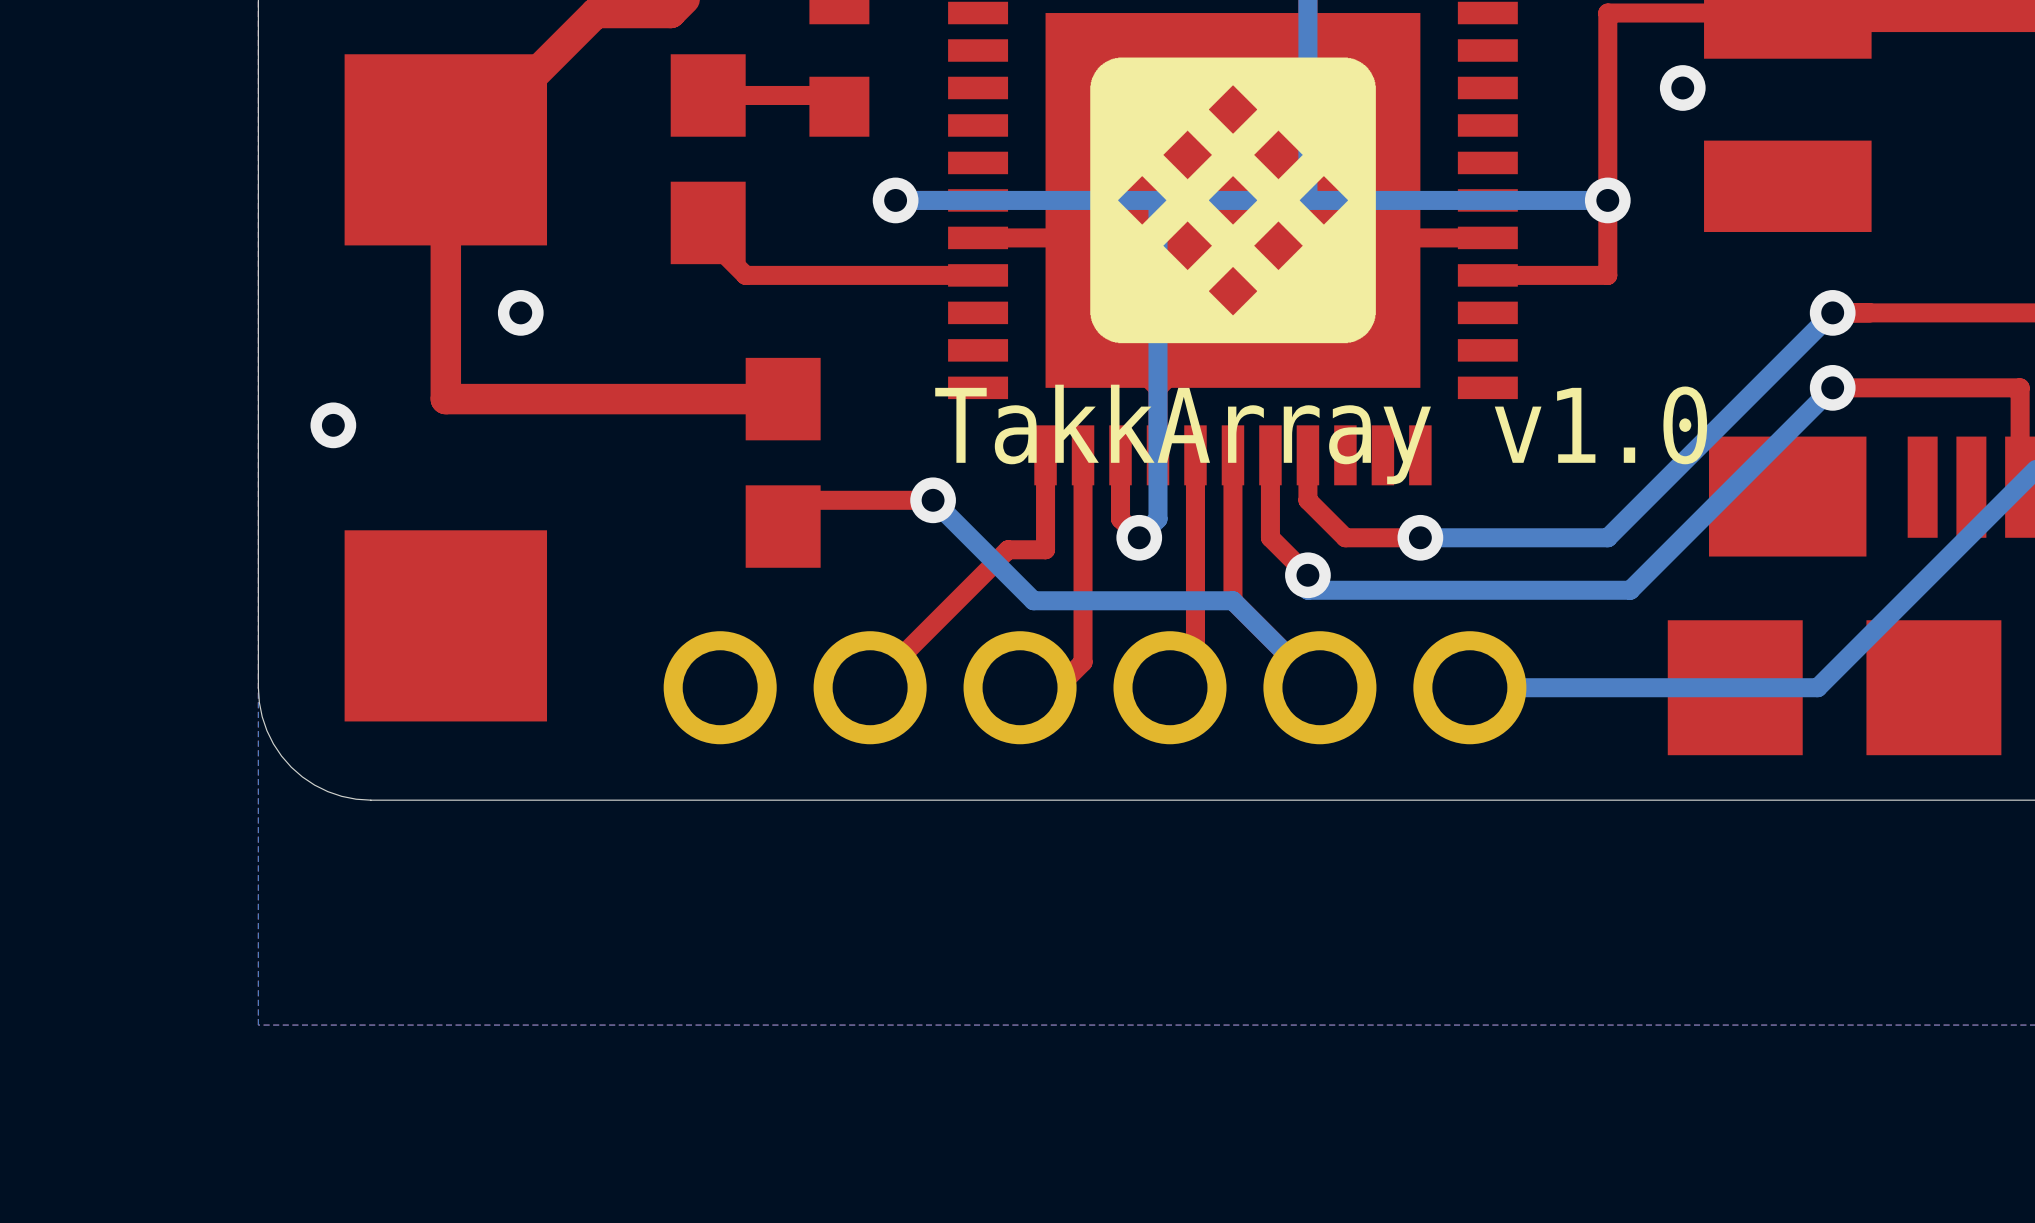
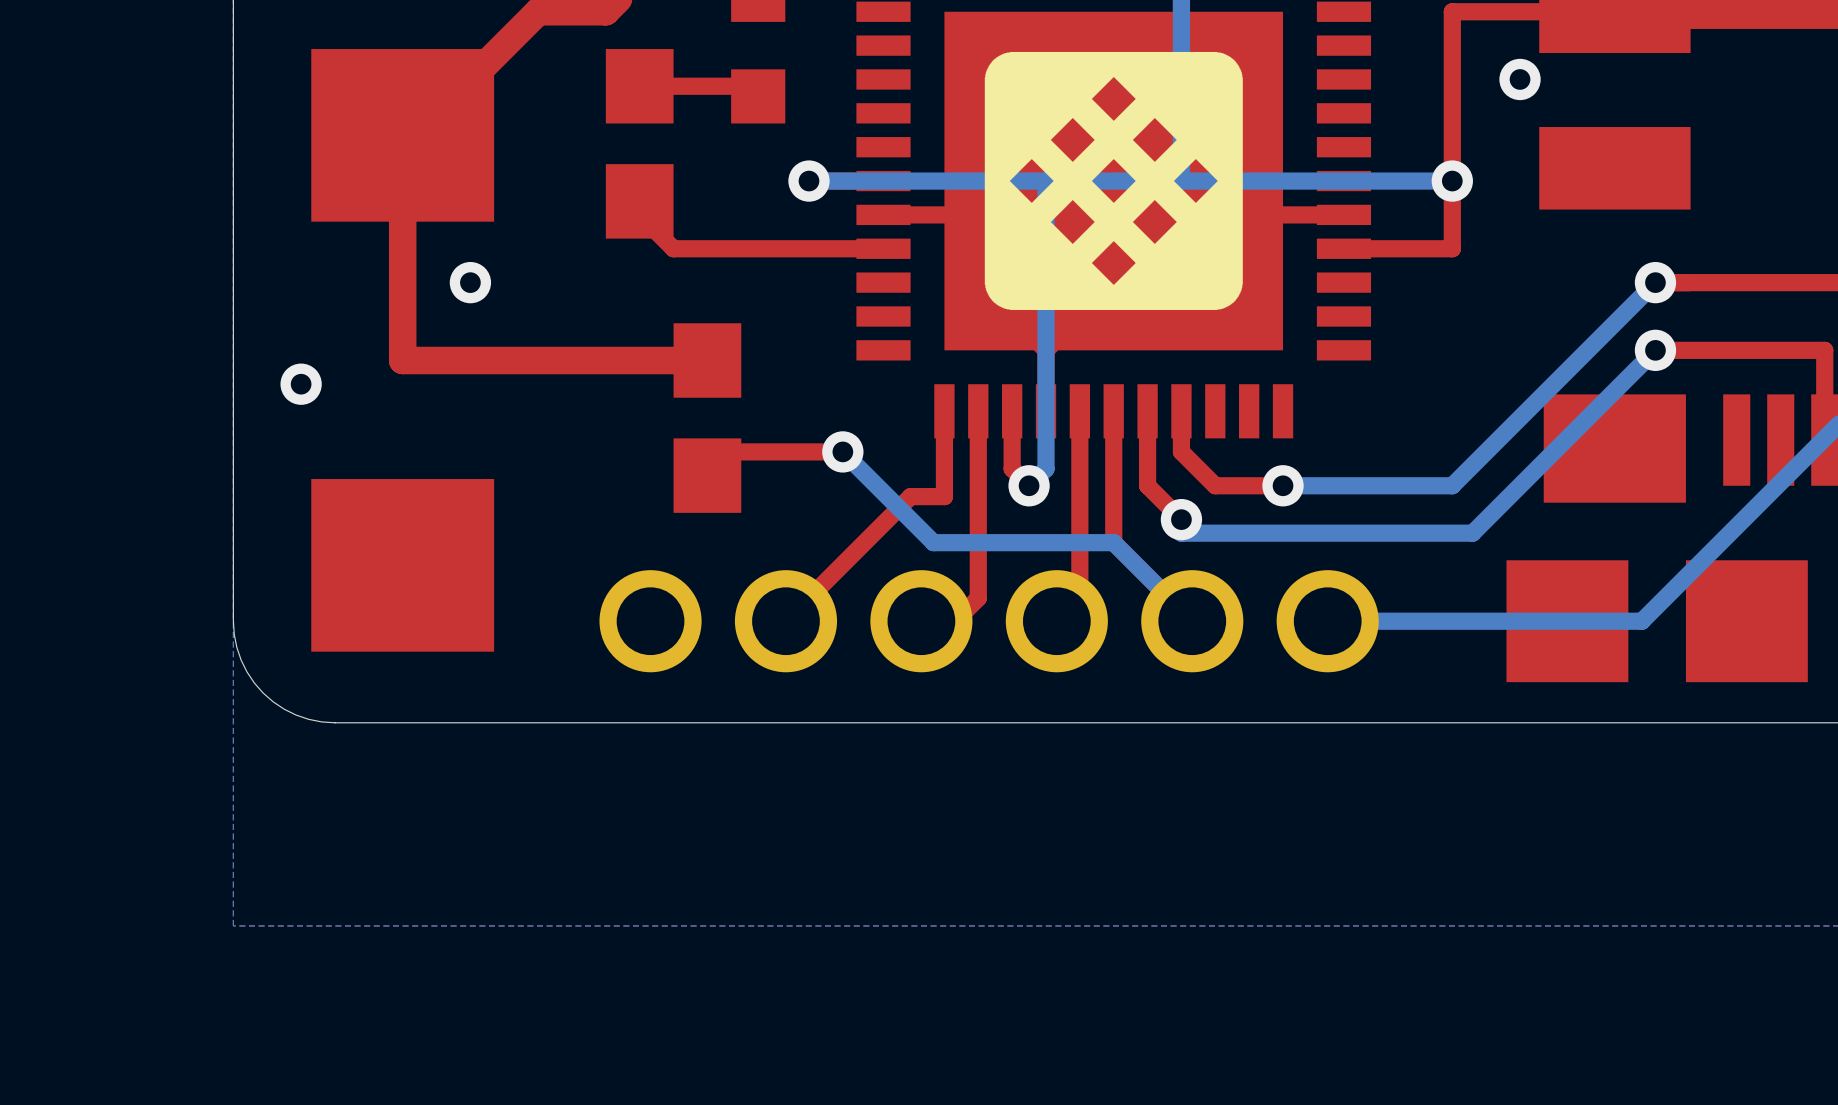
text: TakkArray v1.0 (1321, 434) -> none

